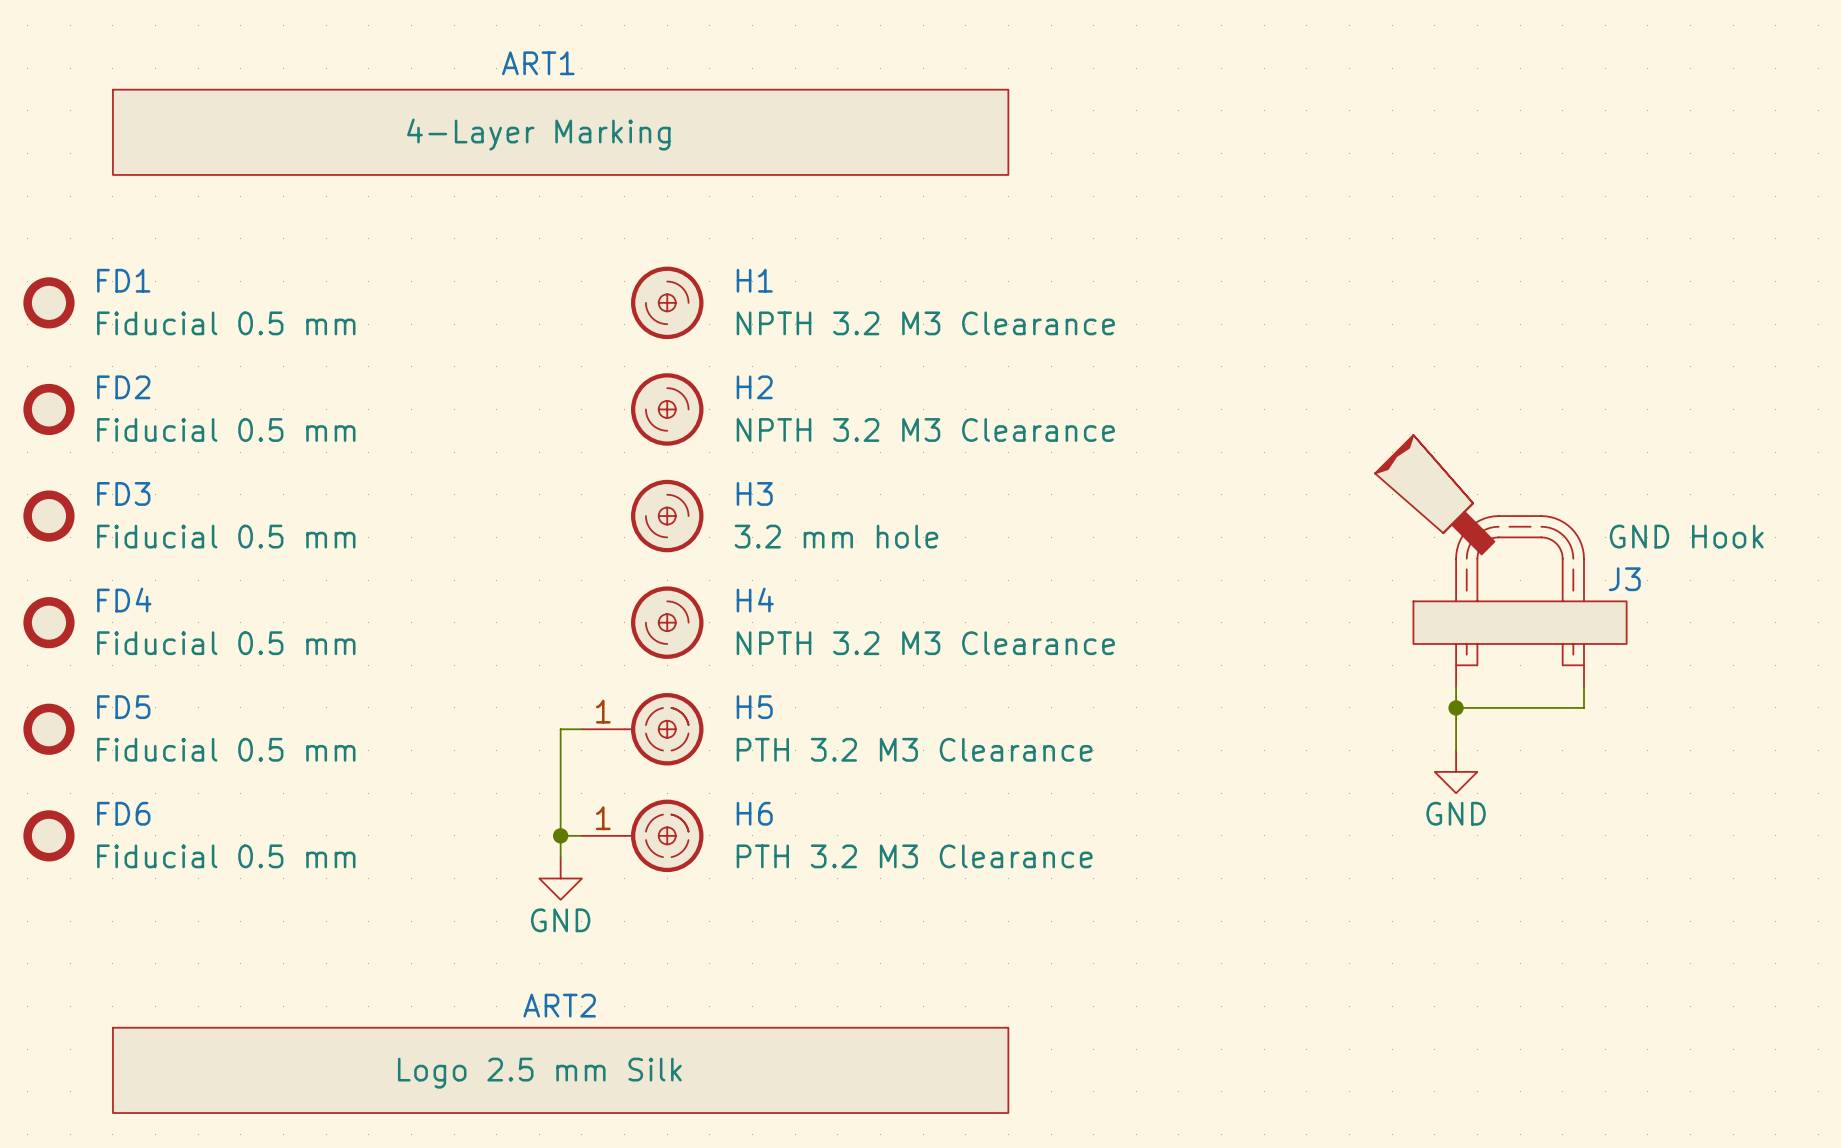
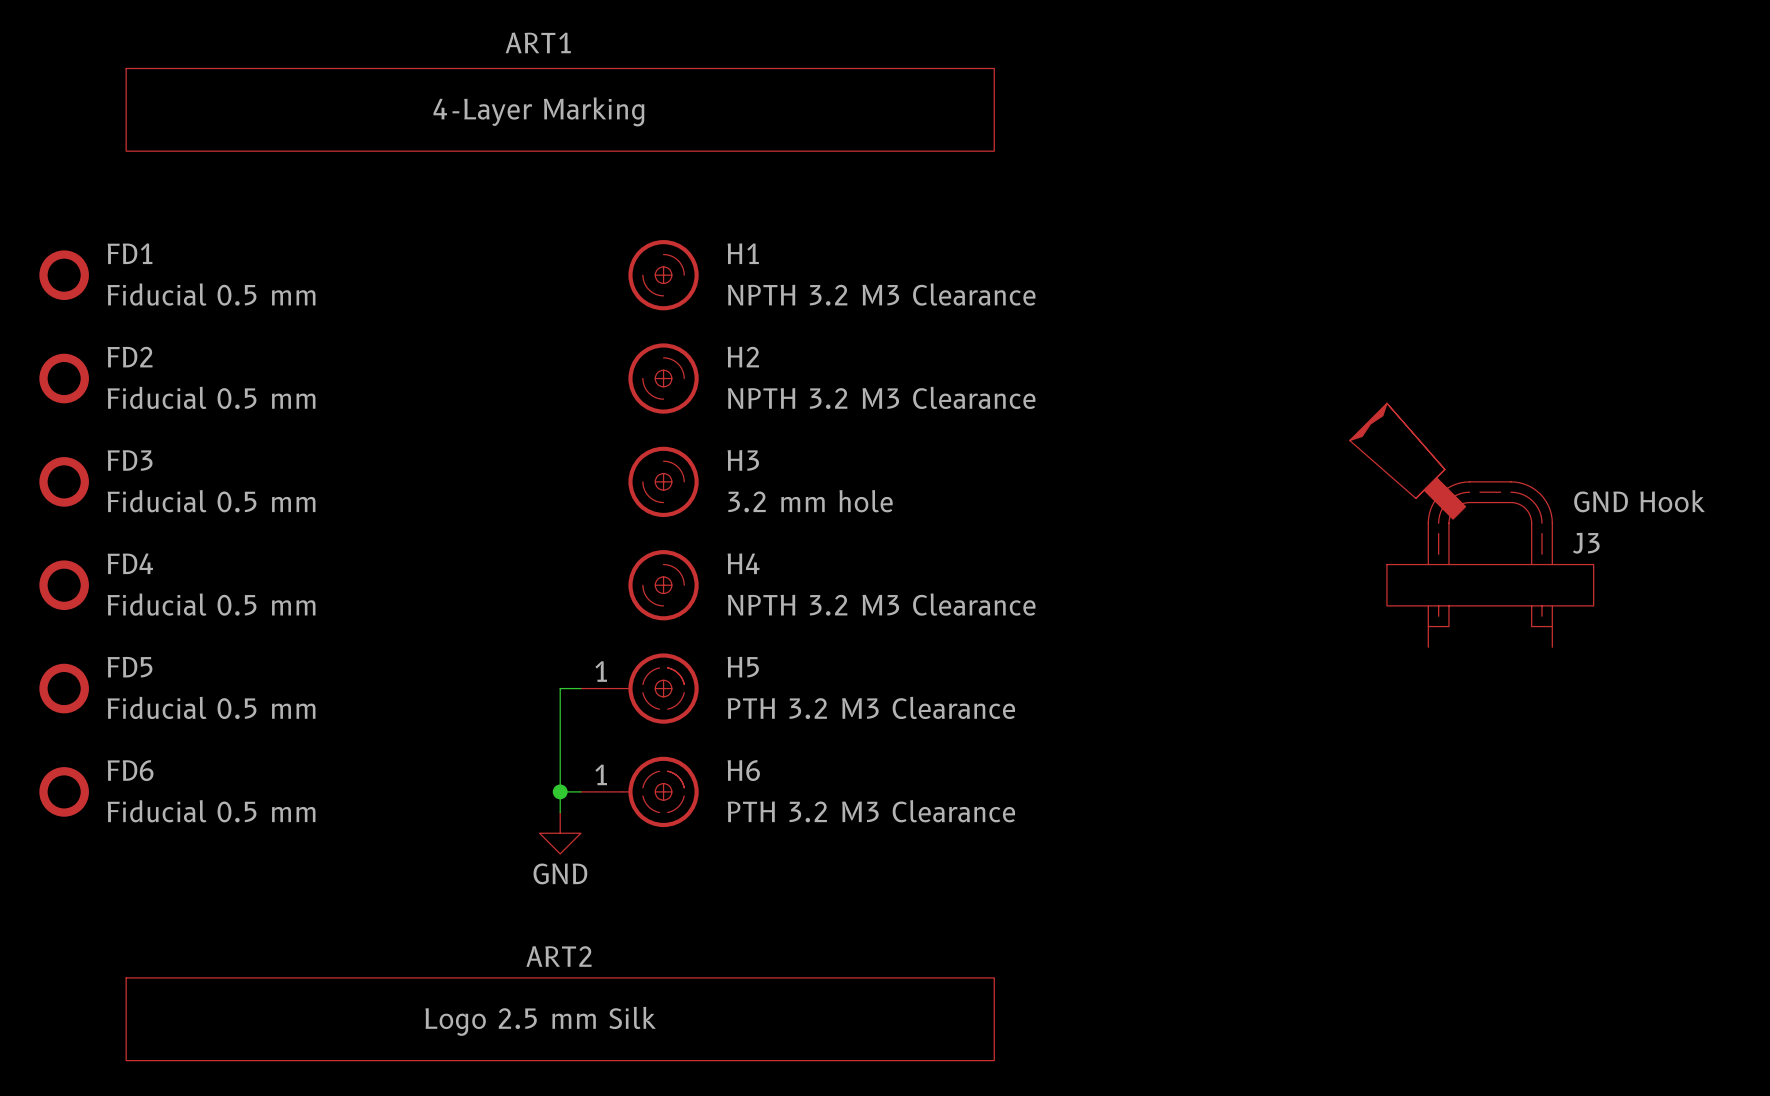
wire: (1456, 686) (1456, 750) -> none
wire: (1583, 686) (1583, 707) (1456, 707) -> none
junction: (1456, 707) -> none
power symbol: GND (1456, 771) -> none

